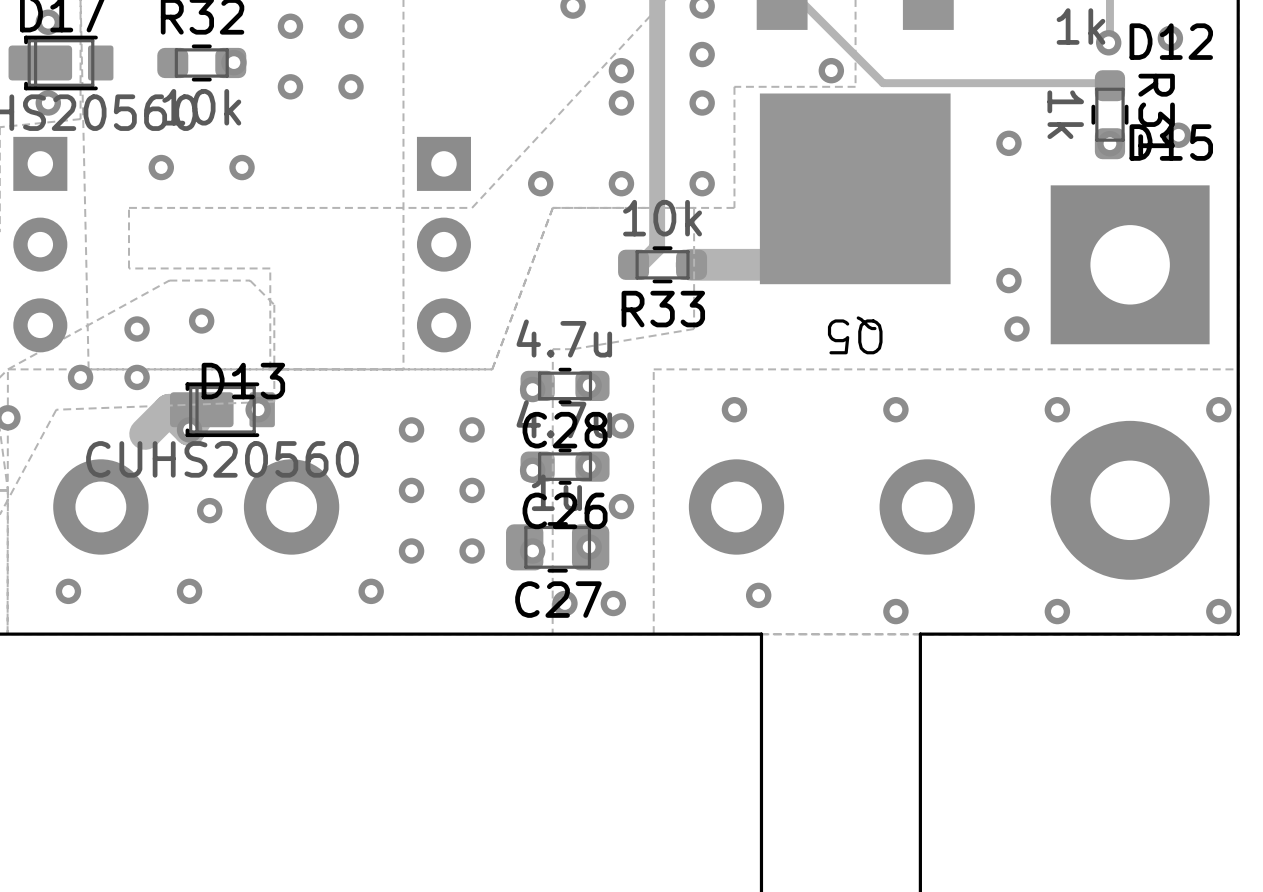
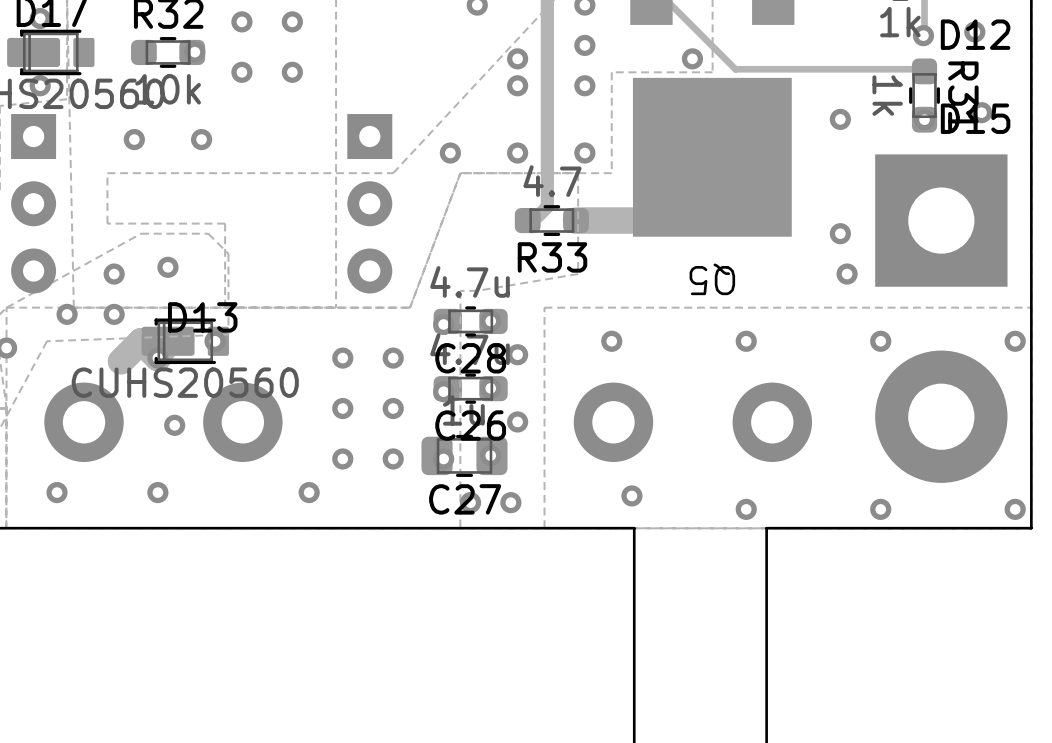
R33 value: 10k (662, 218) -> 4.7 (552, 181)

